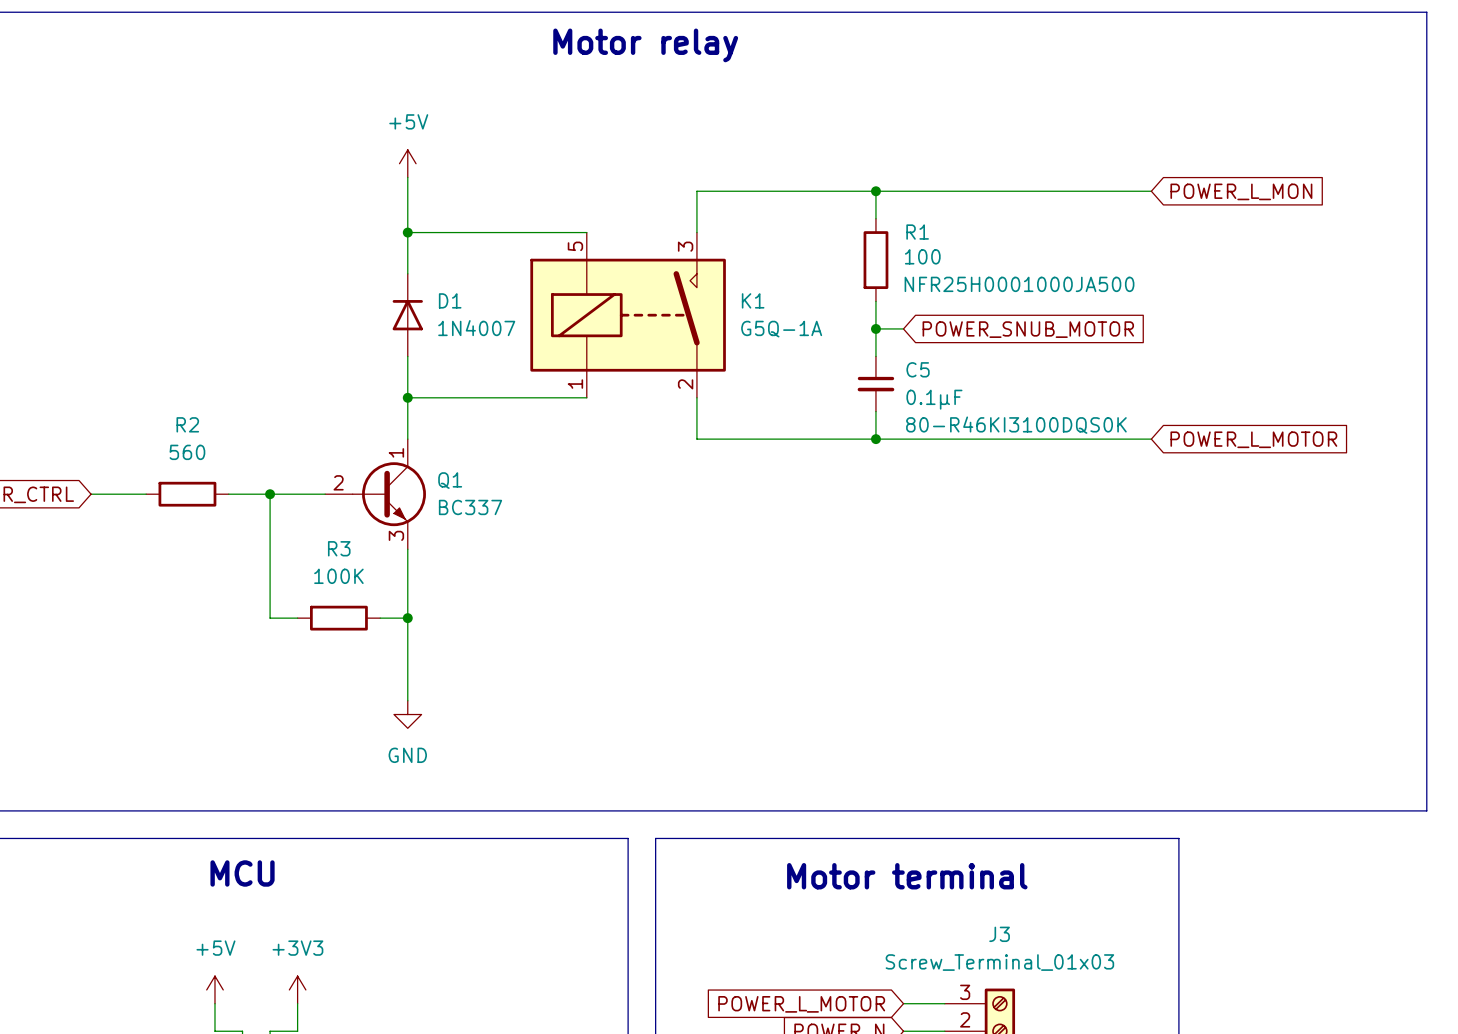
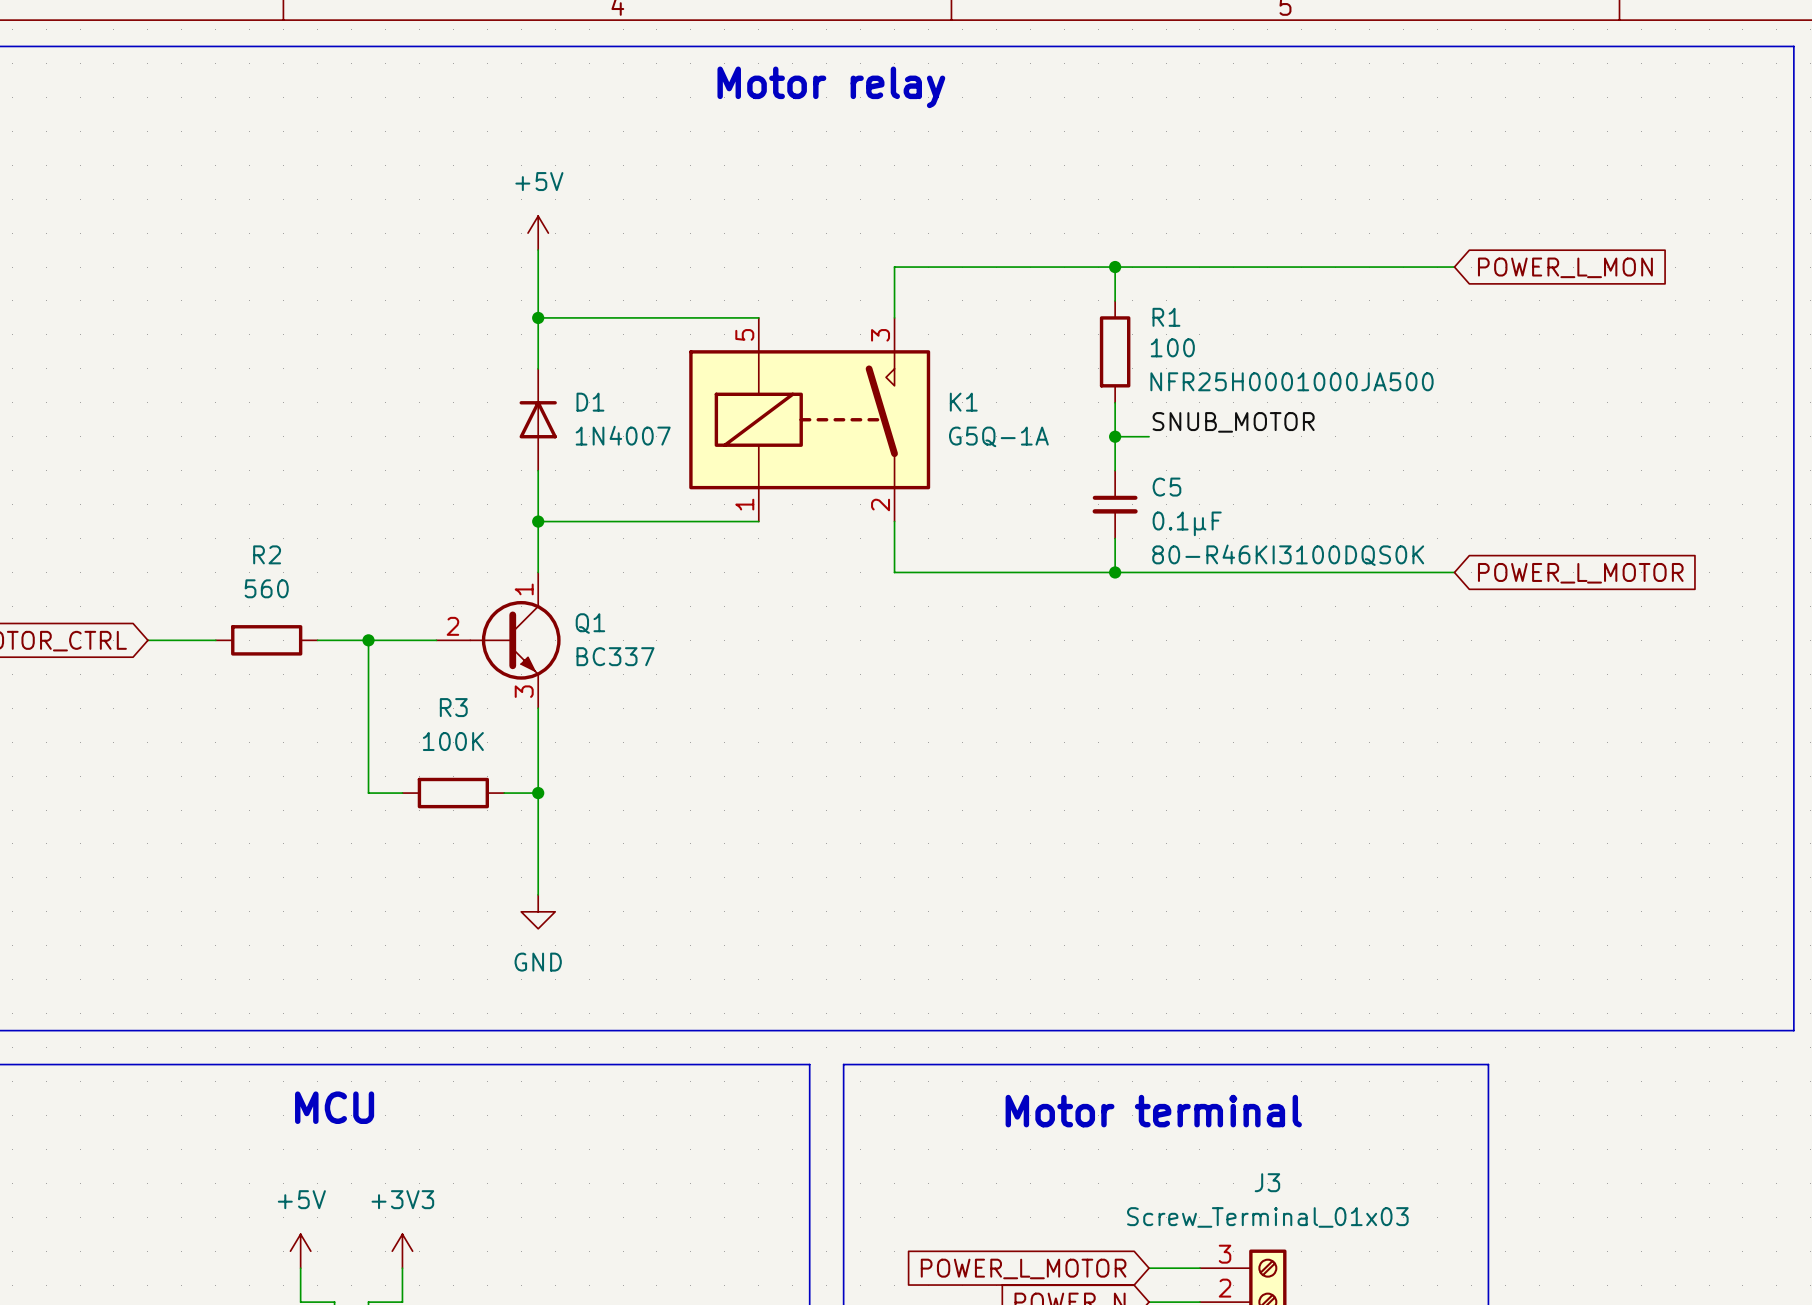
label: none -> SNUB_MOTOR (1233, 422)
global label: POWER_SNUB_MOTOR (1028, 329) -> none

